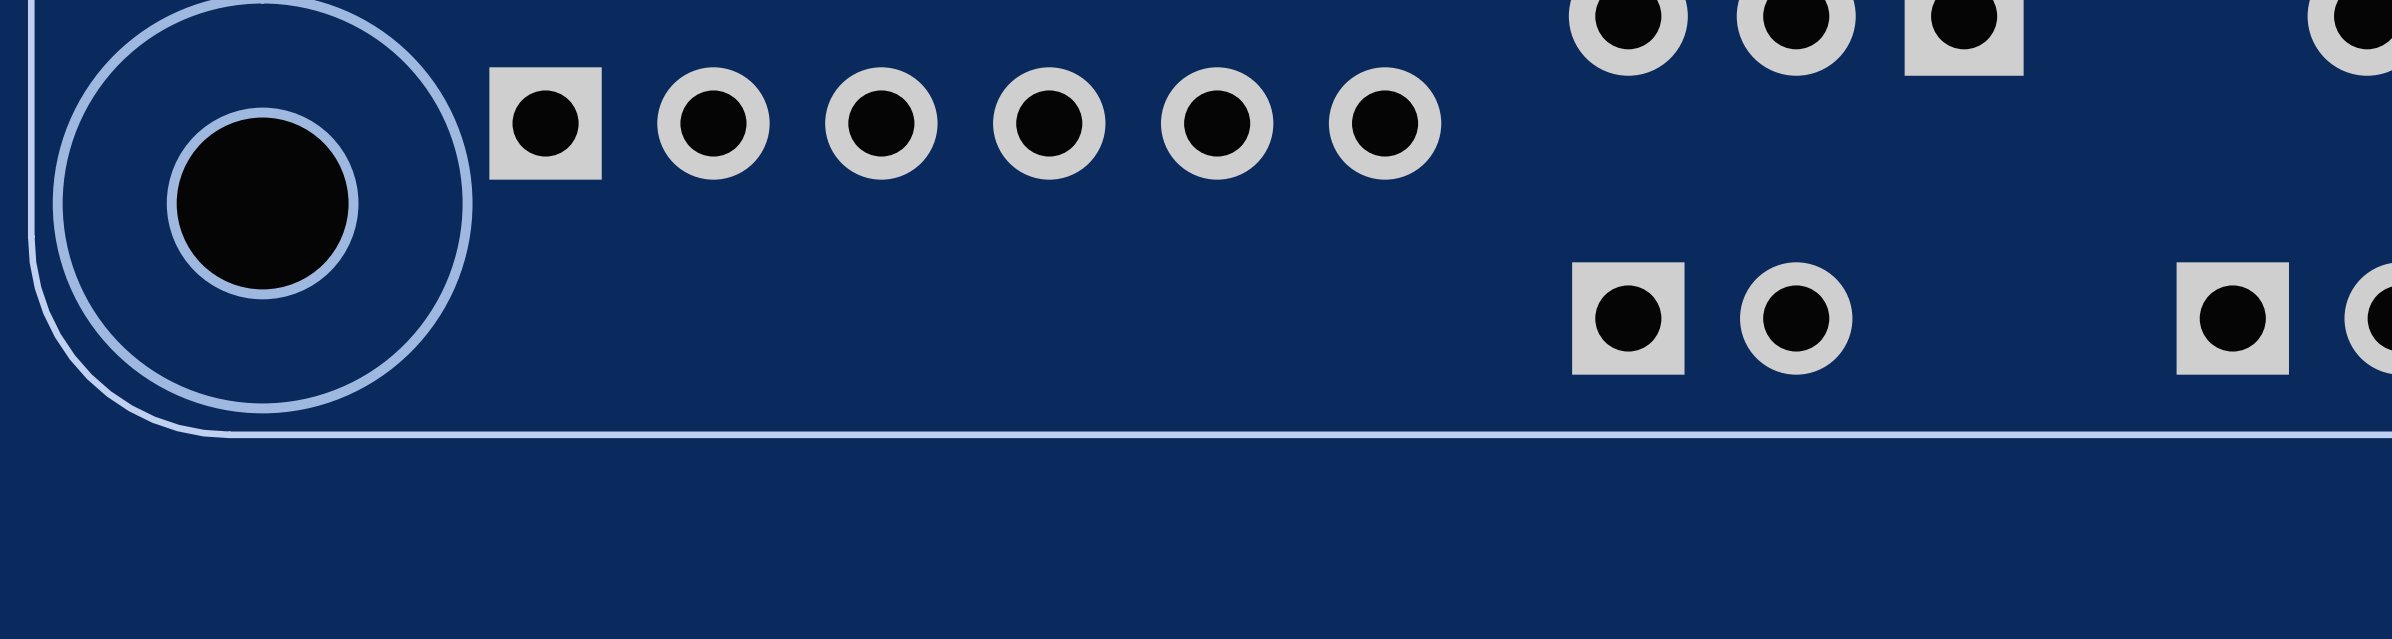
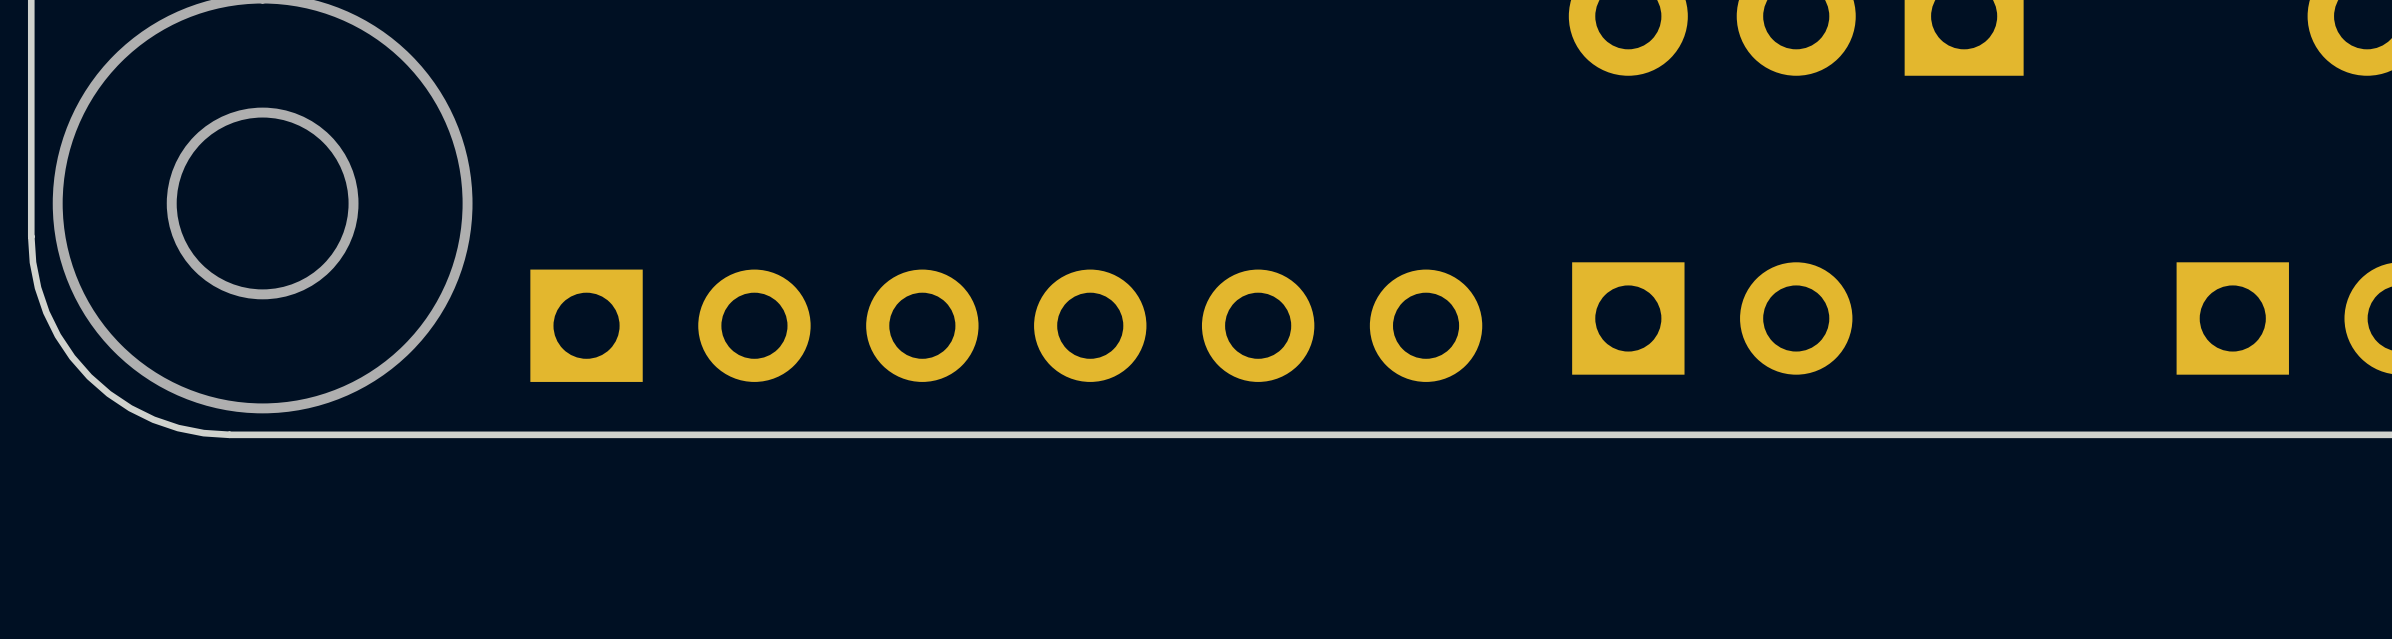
part position: (965, 123) -> (1006, 325)

